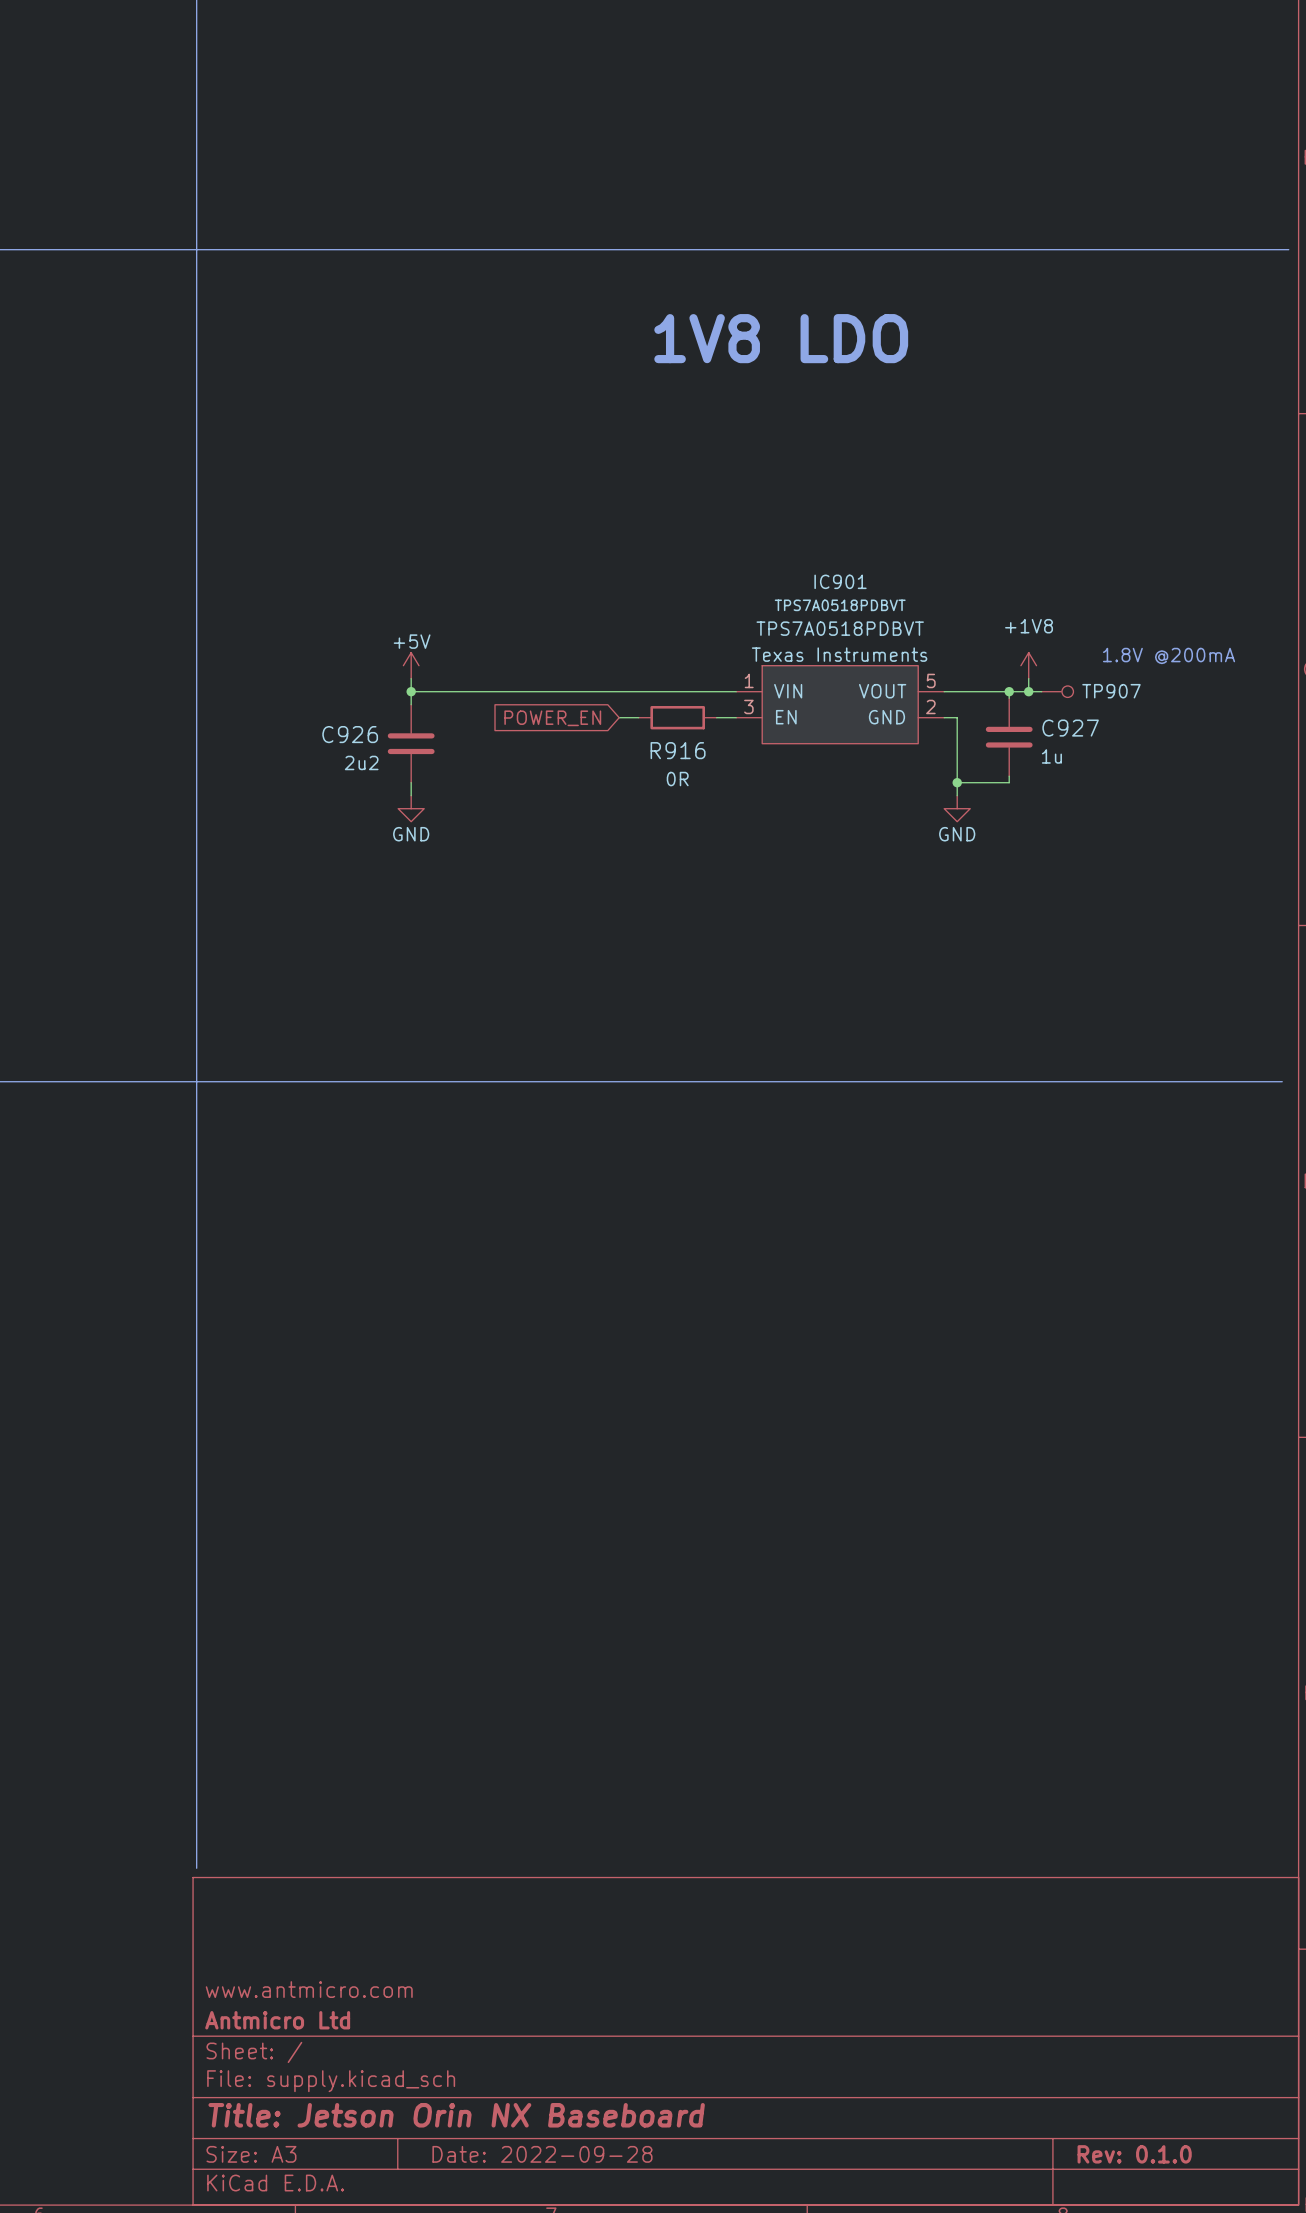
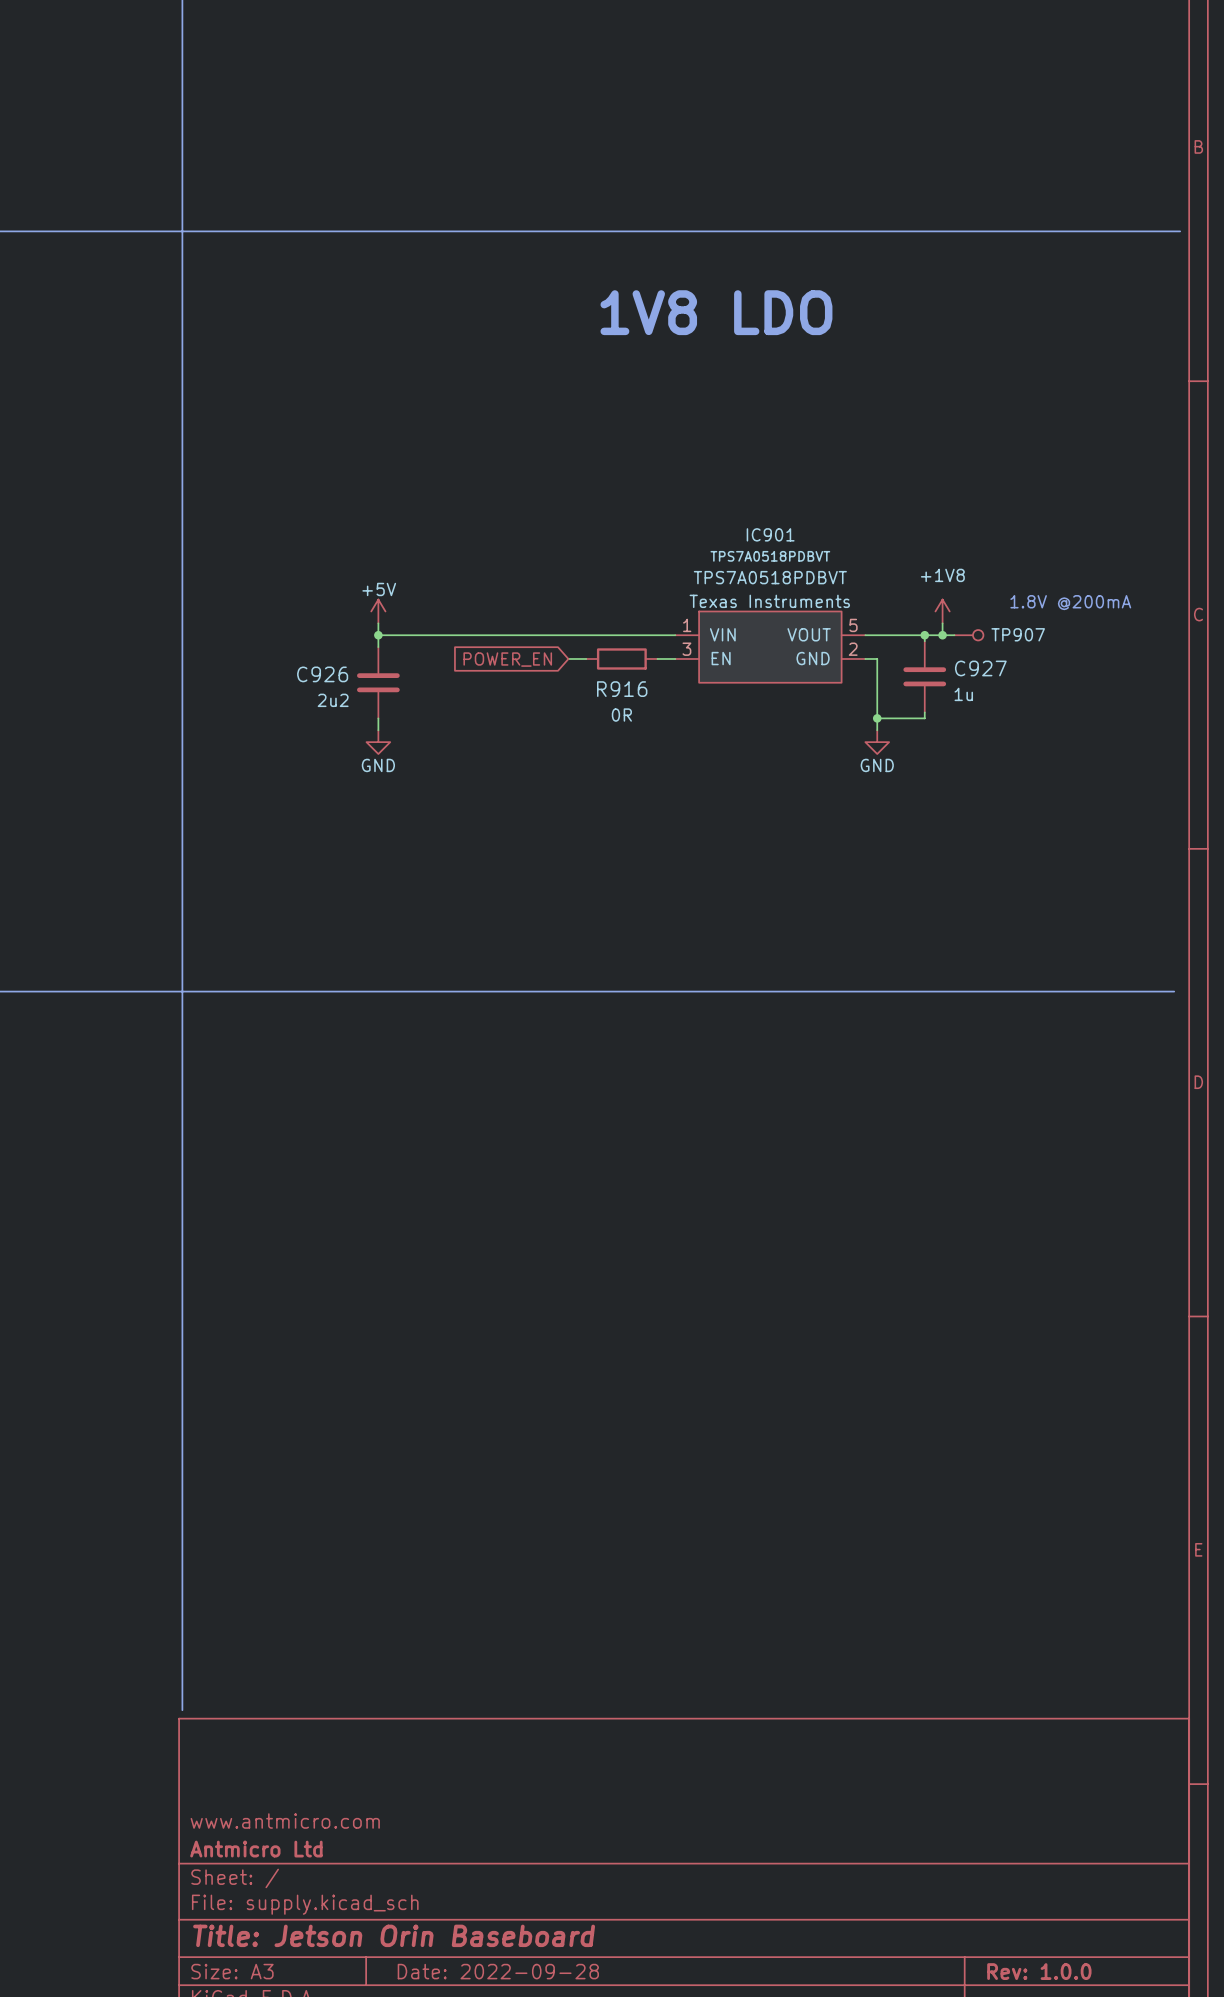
title block: Title: Jetson Orin NX Baseboard (456, 2115) -> Title: Jetson Orin Baseboard (394, 1935)
title block: Rev: 0.1.0 (1134, 2154) -> Rev: 1.0.0 (1039, 1971)

